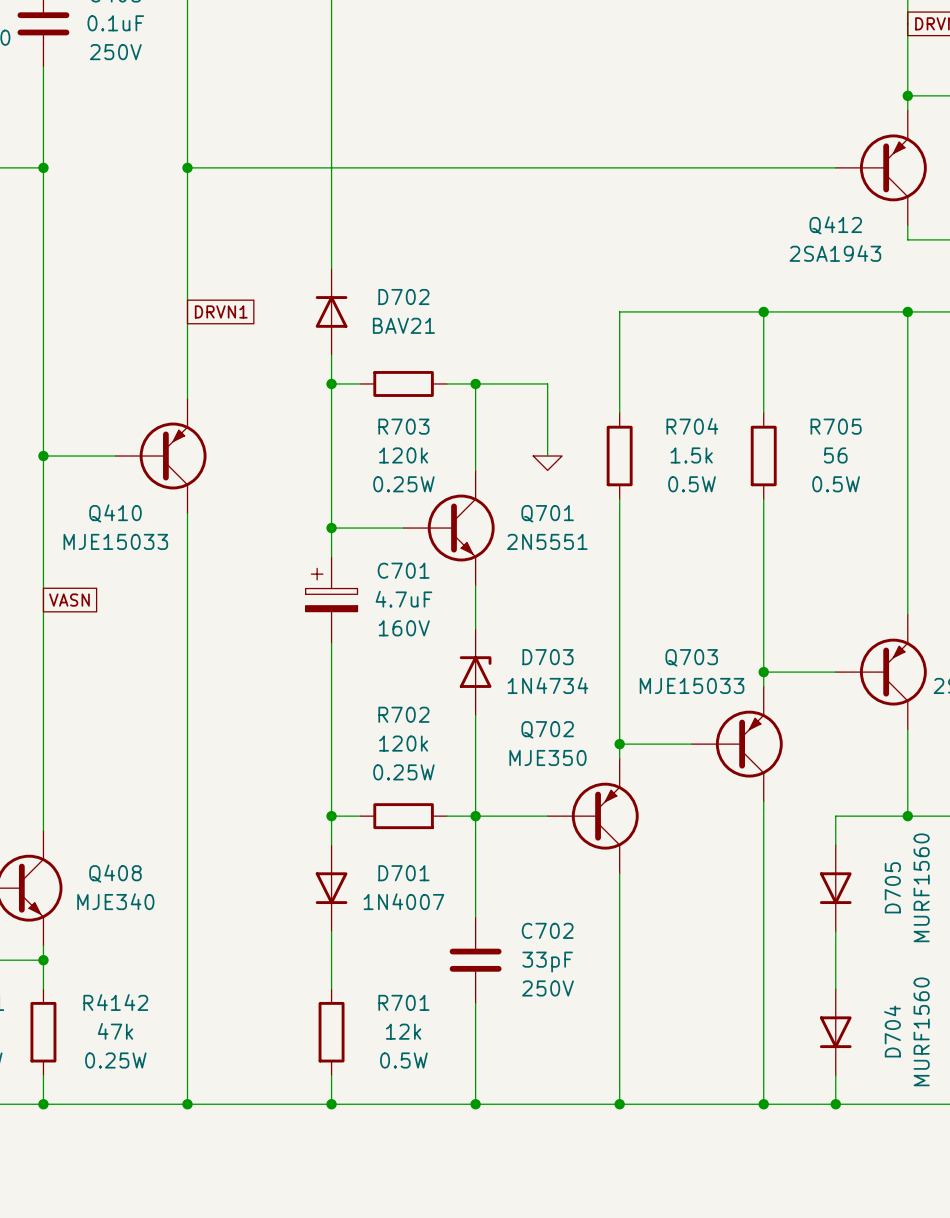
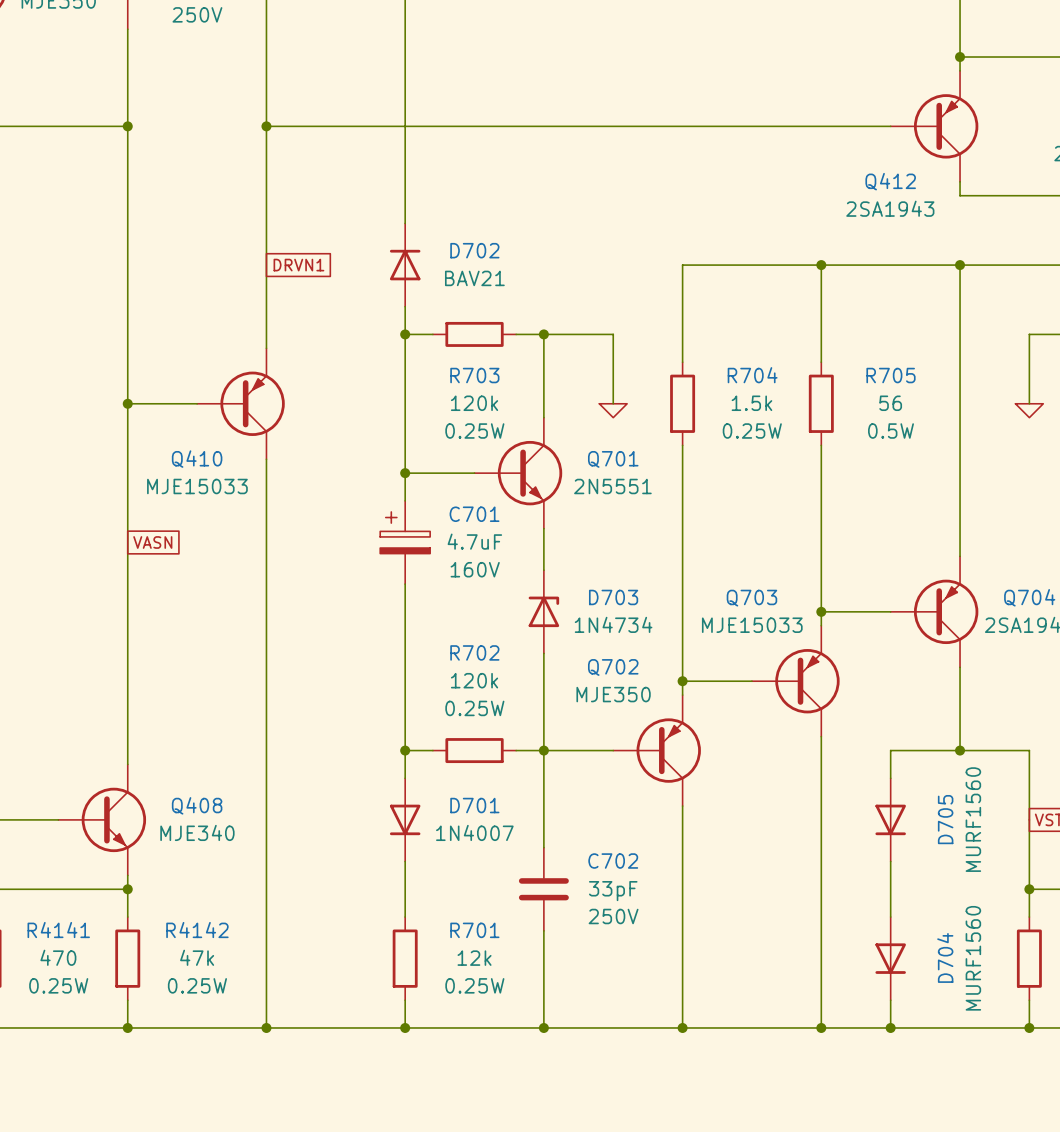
R704 text: 0.5W (692, 484) -> 0.25W (752, 431)
R701 text: 0.5W (403, 1060) -> 0.25W (474, 985)

